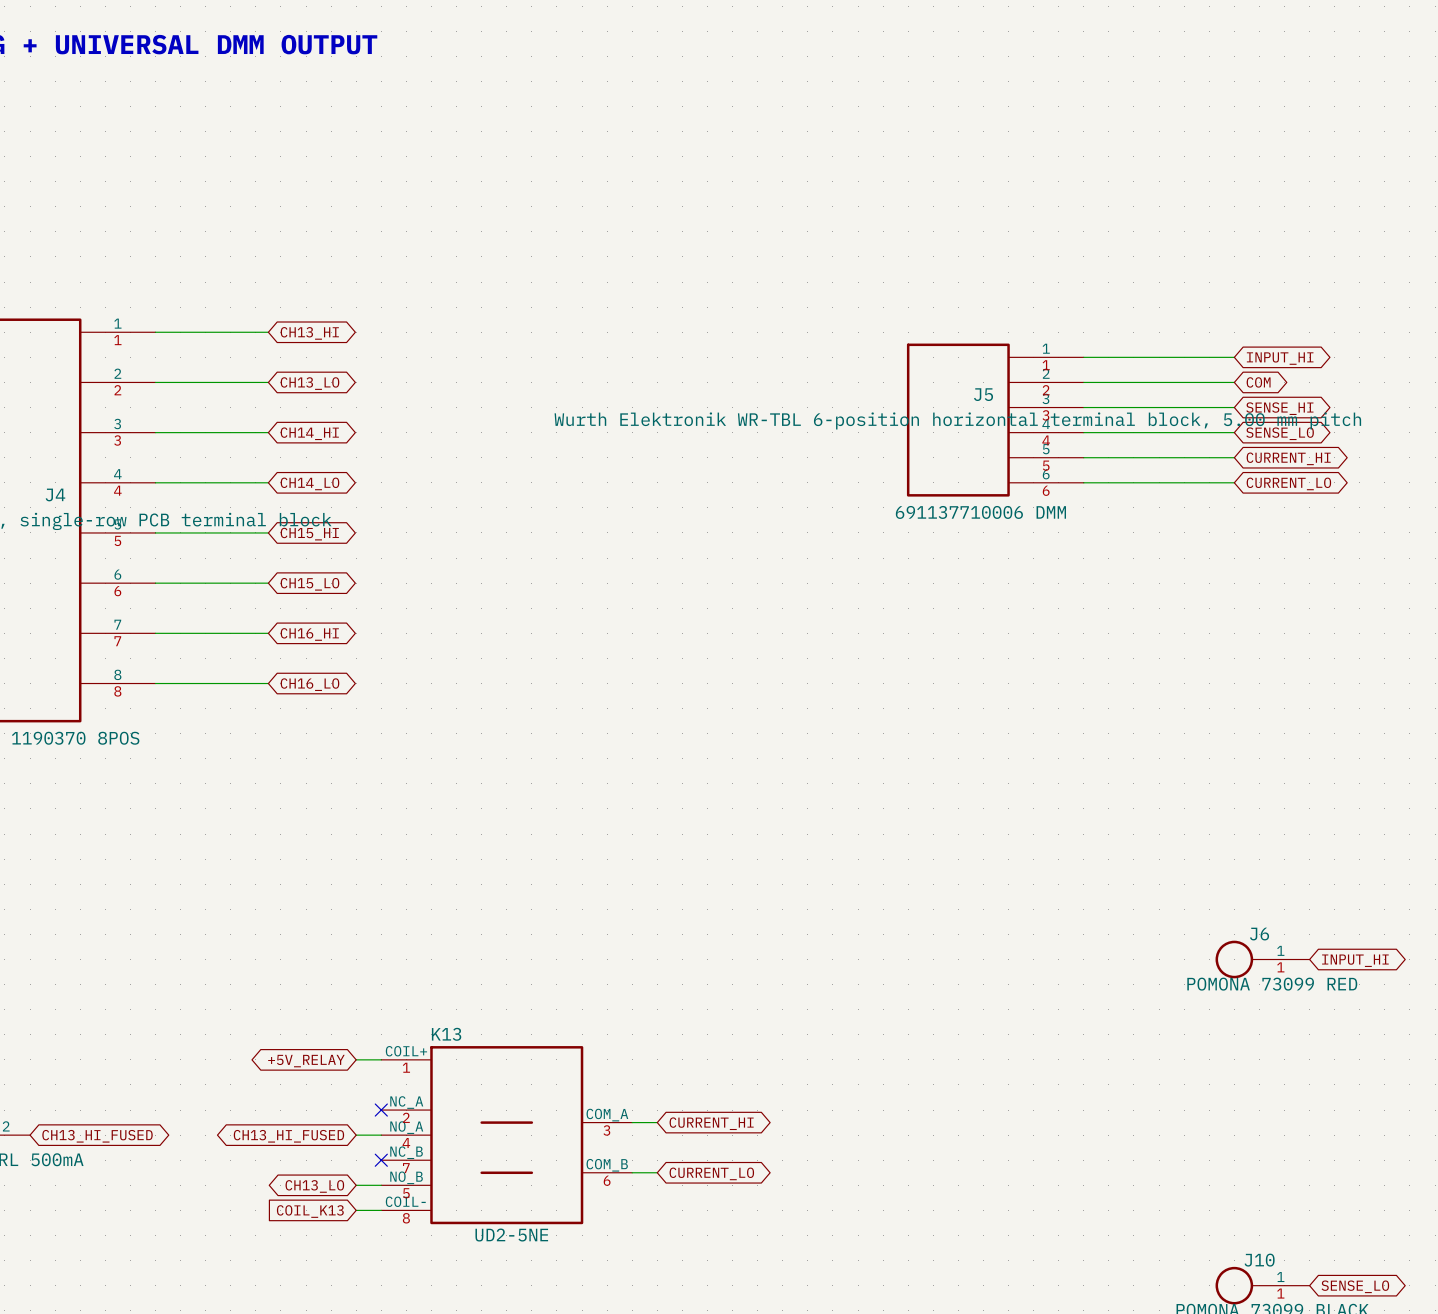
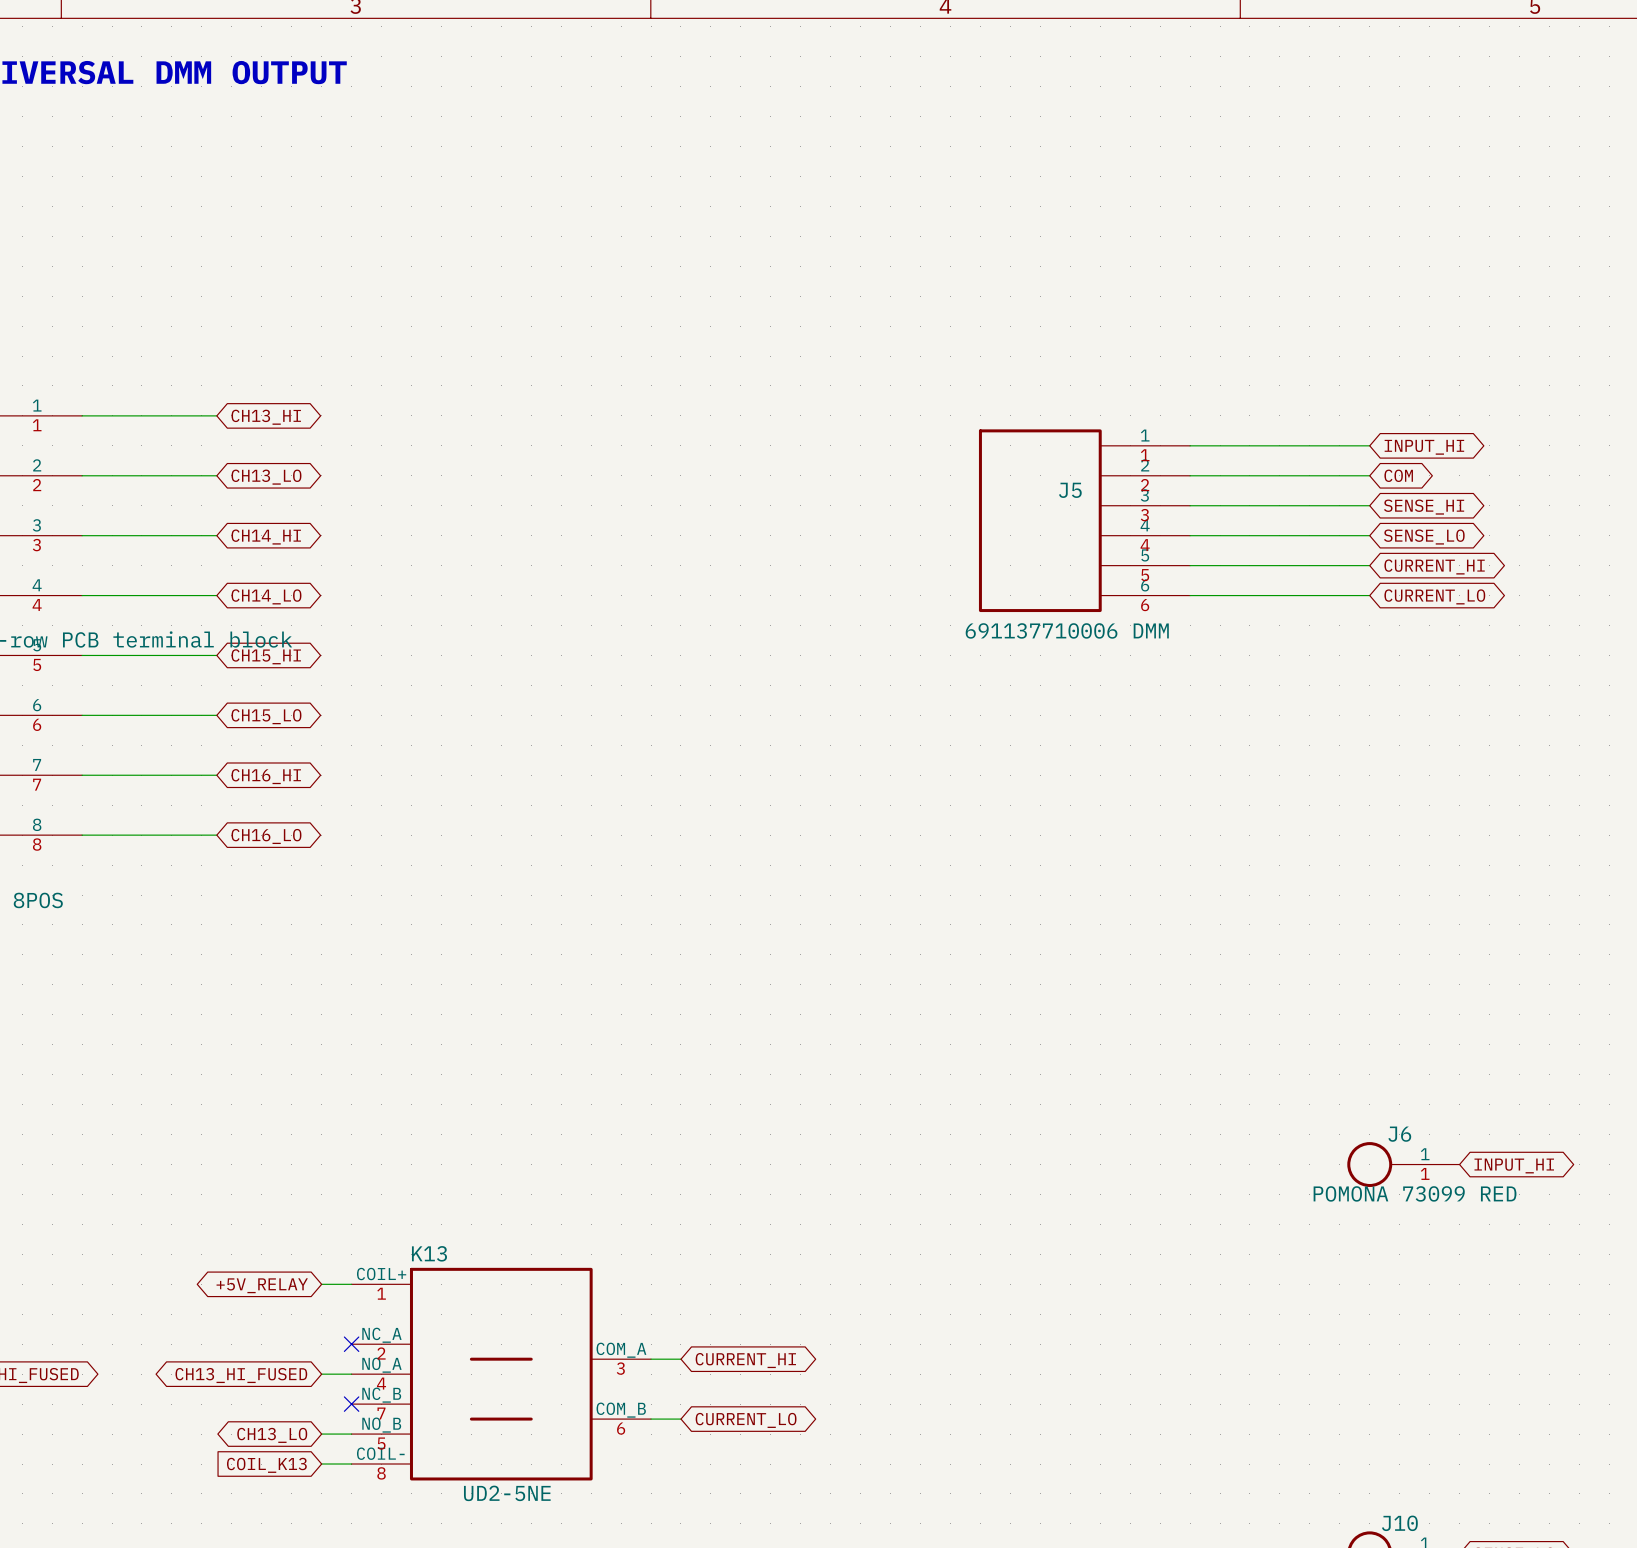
J5 text: Wurth Elektronik WR-TBL 6-position horizontal terminal block, 5.00 mm pitch (957, 420) -> none

